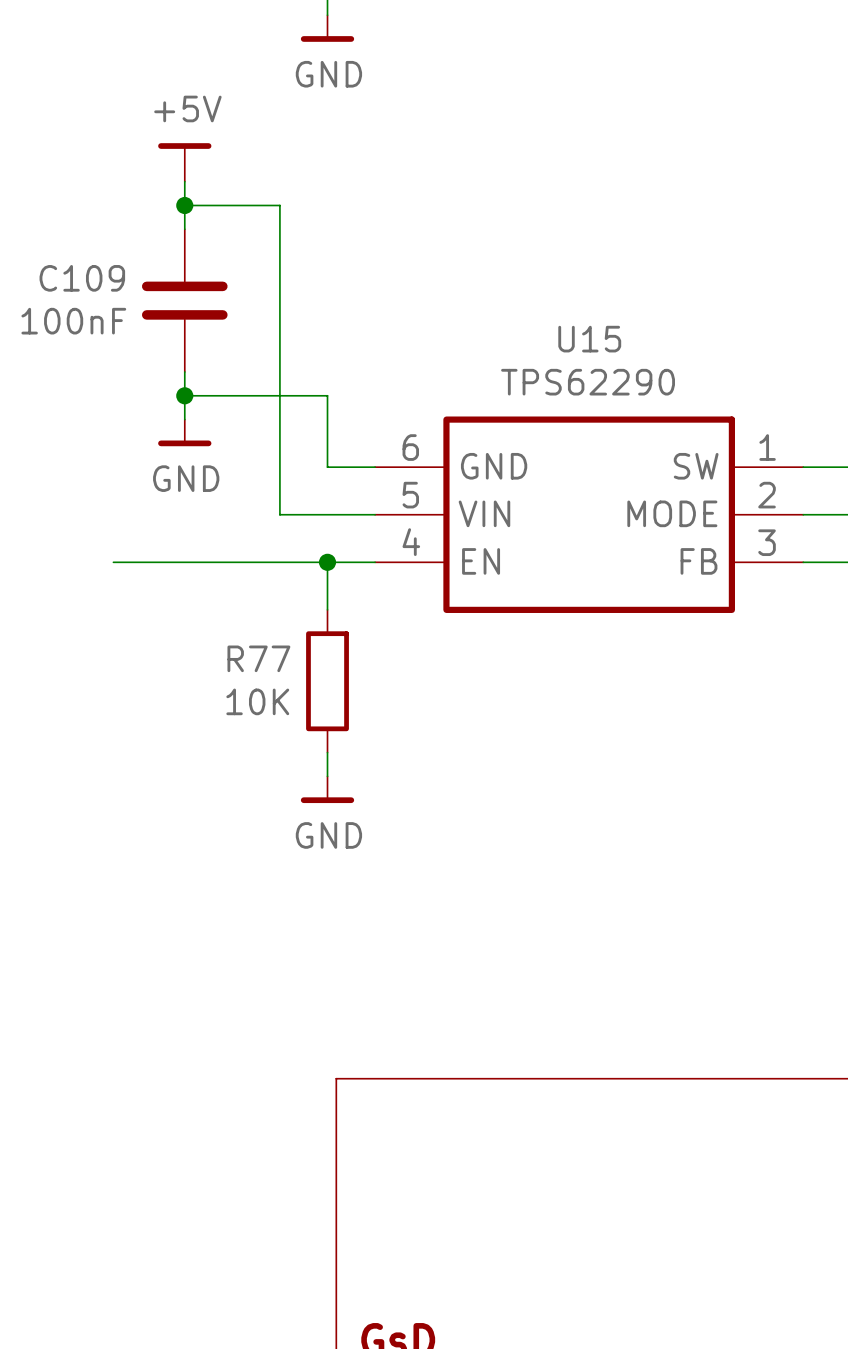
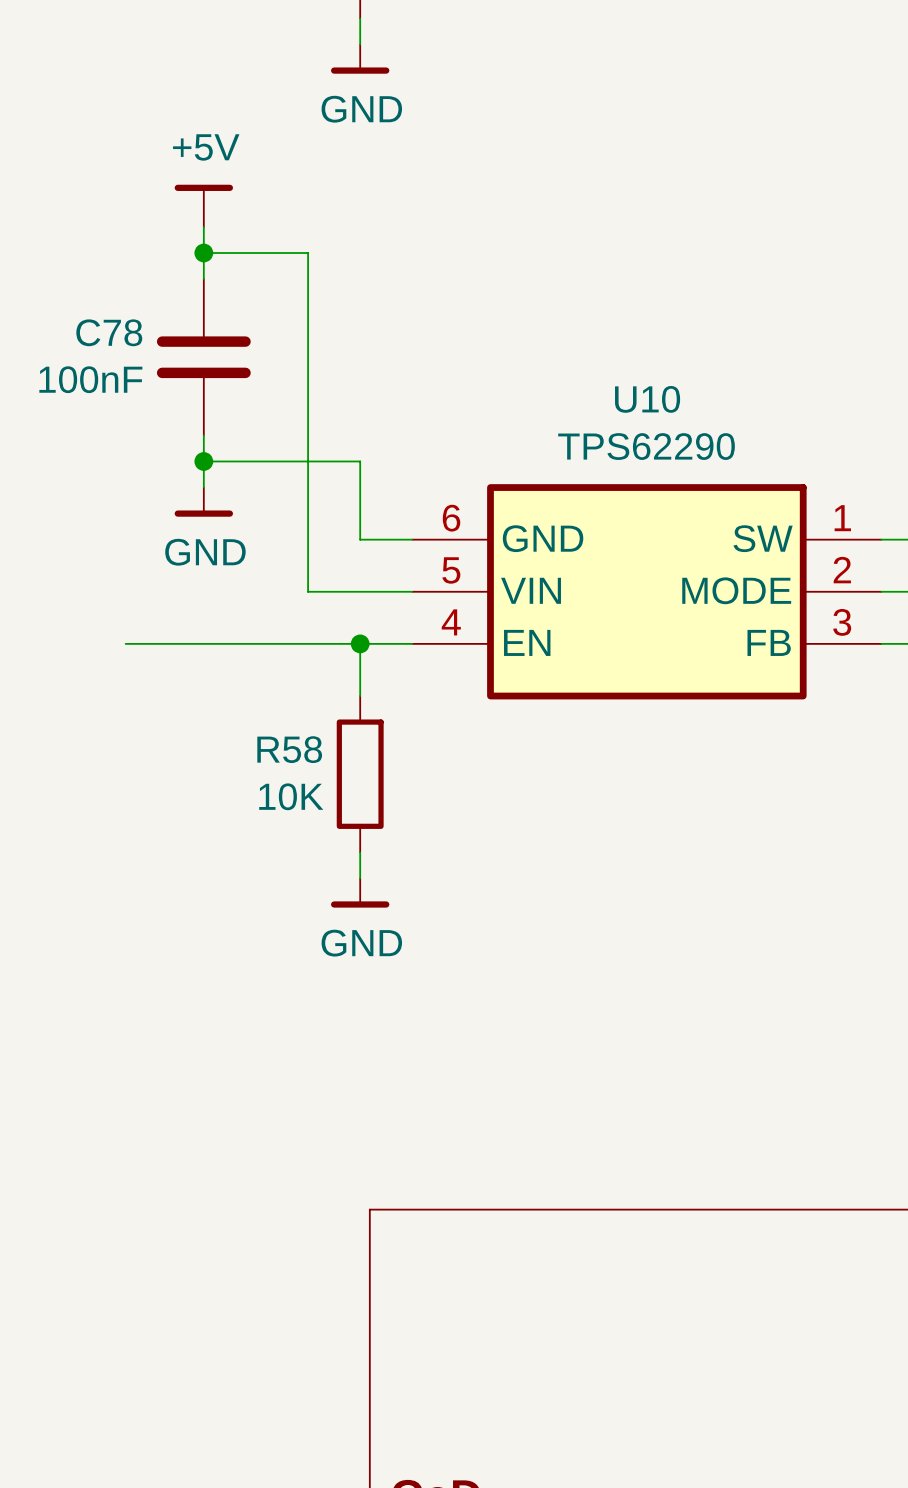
C109 name: C109 (82, 278) -> C78 (109, 332)
U15 name: U15 (589, 339) -> U10 (647, 399)
R77 name: R77 (258, 658) -> R58 (289, 749)

